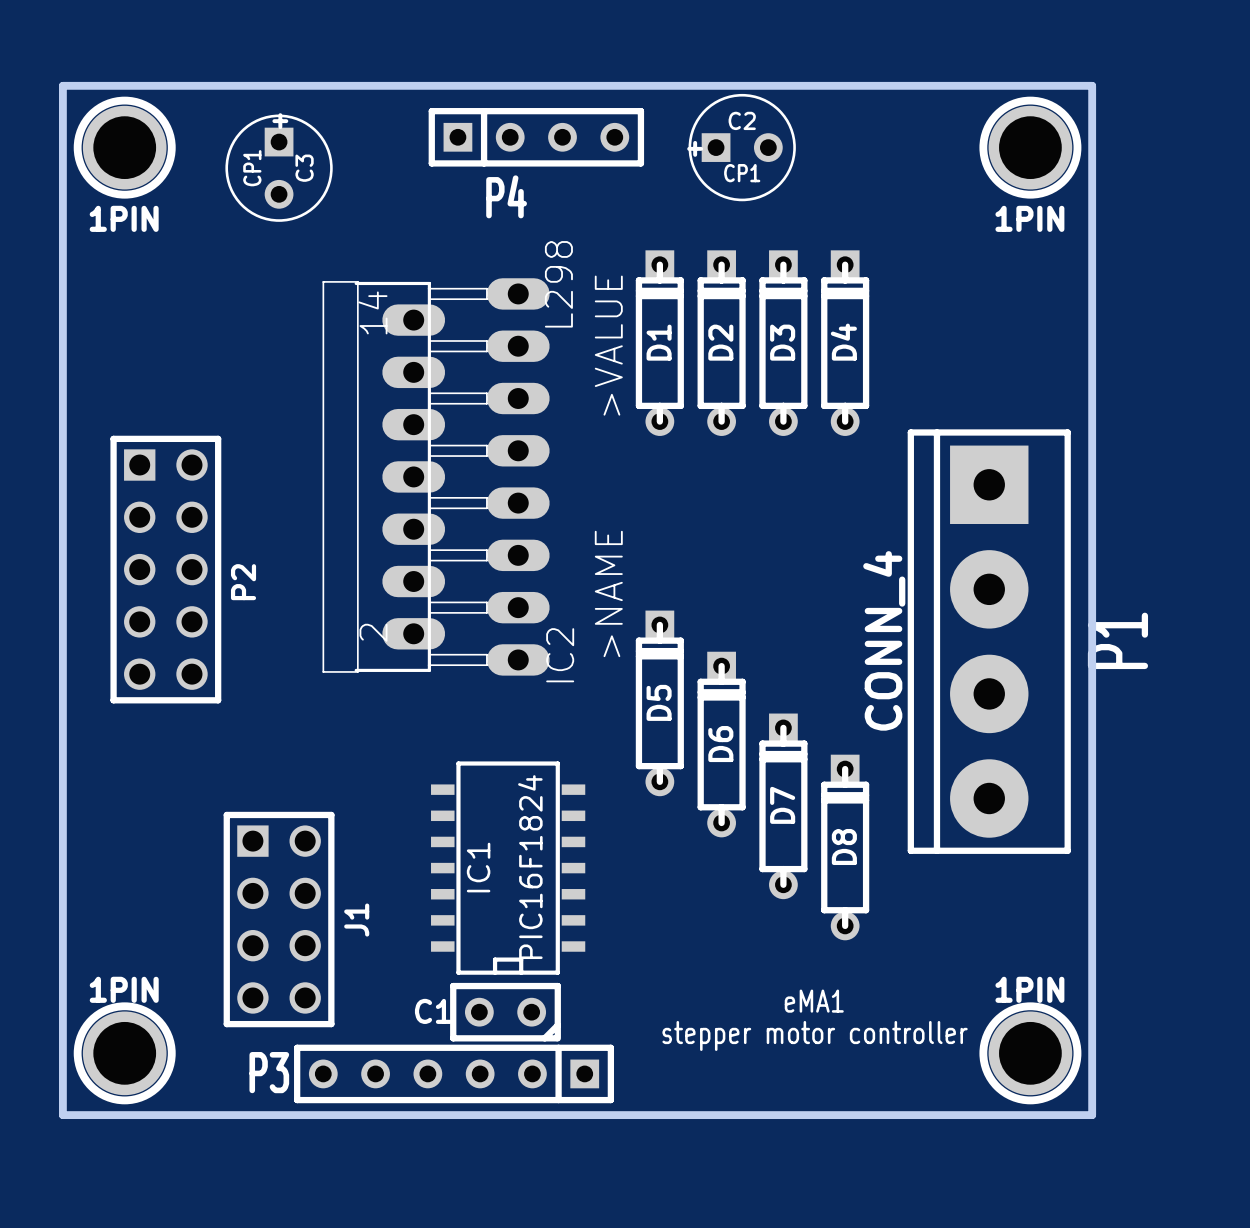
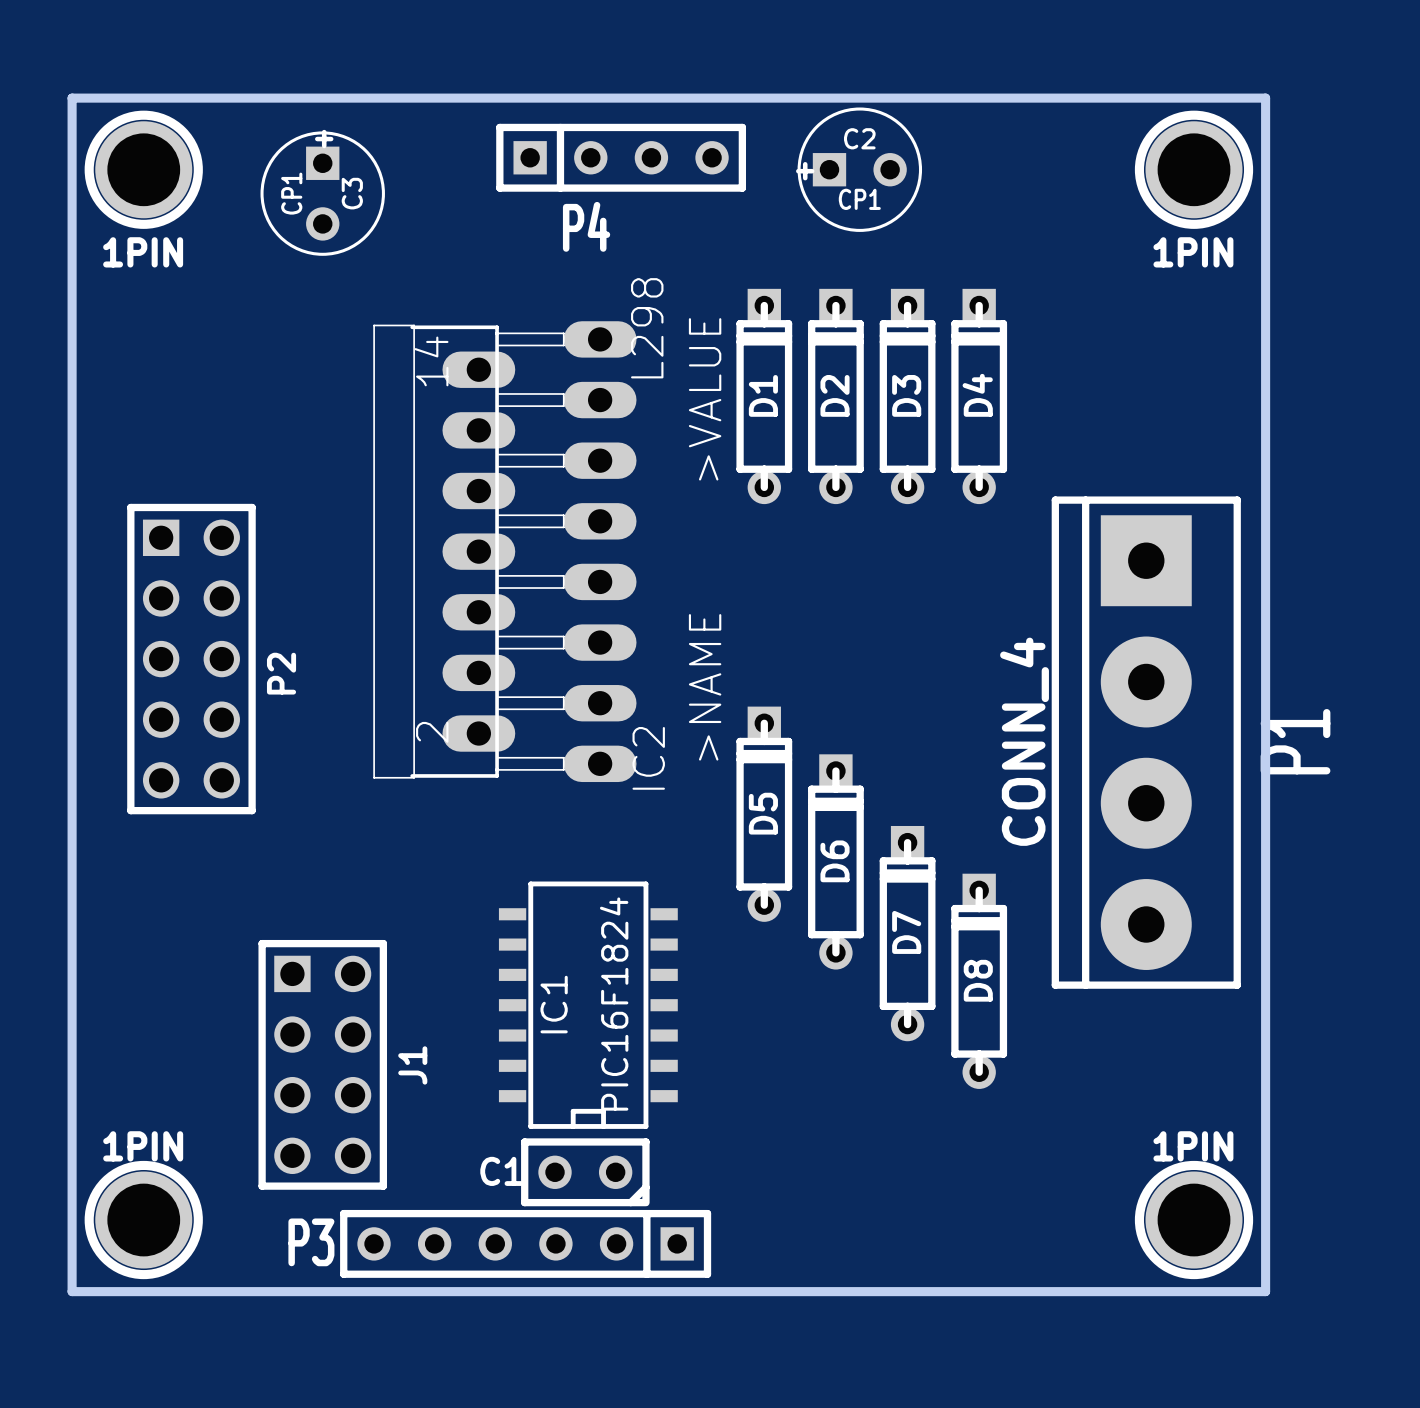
text: eMA1 (814, 1001) -> none
text: stepper motor controller (815, 1035) -> none

